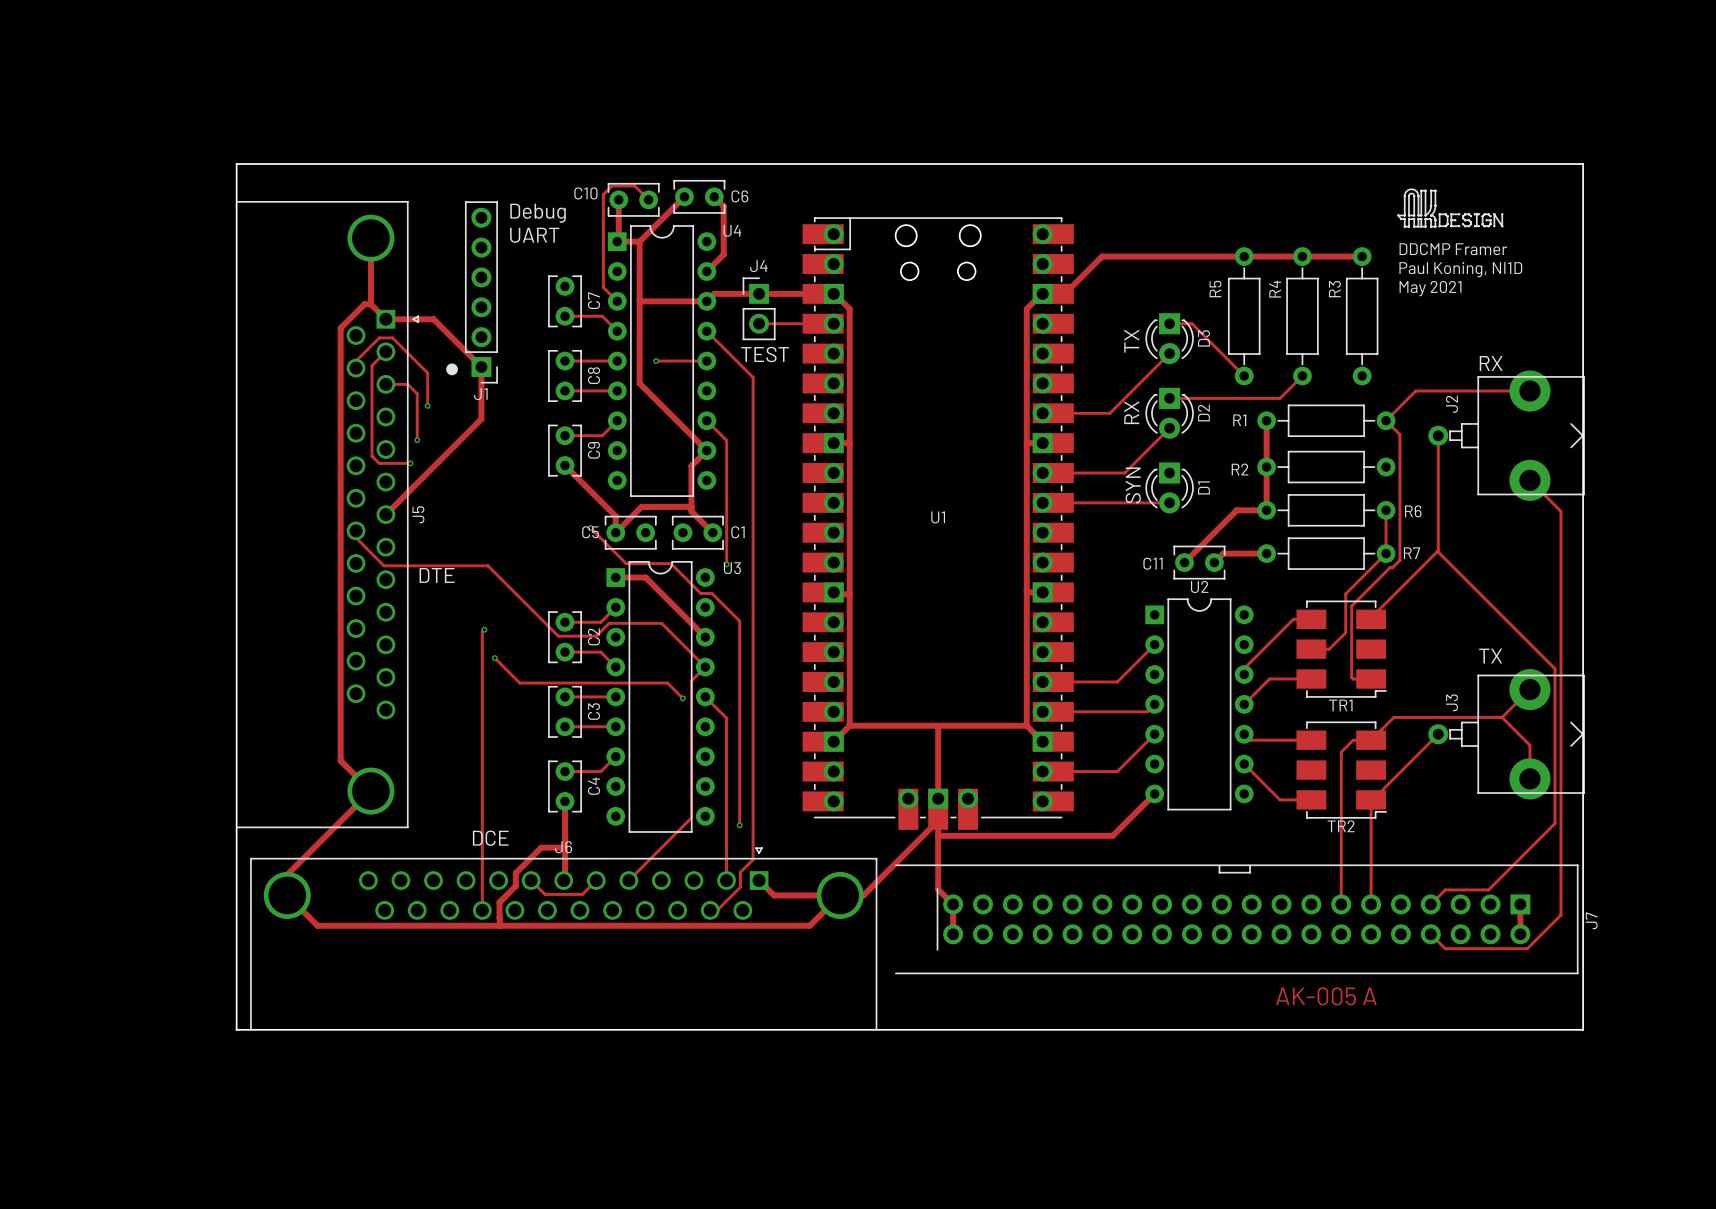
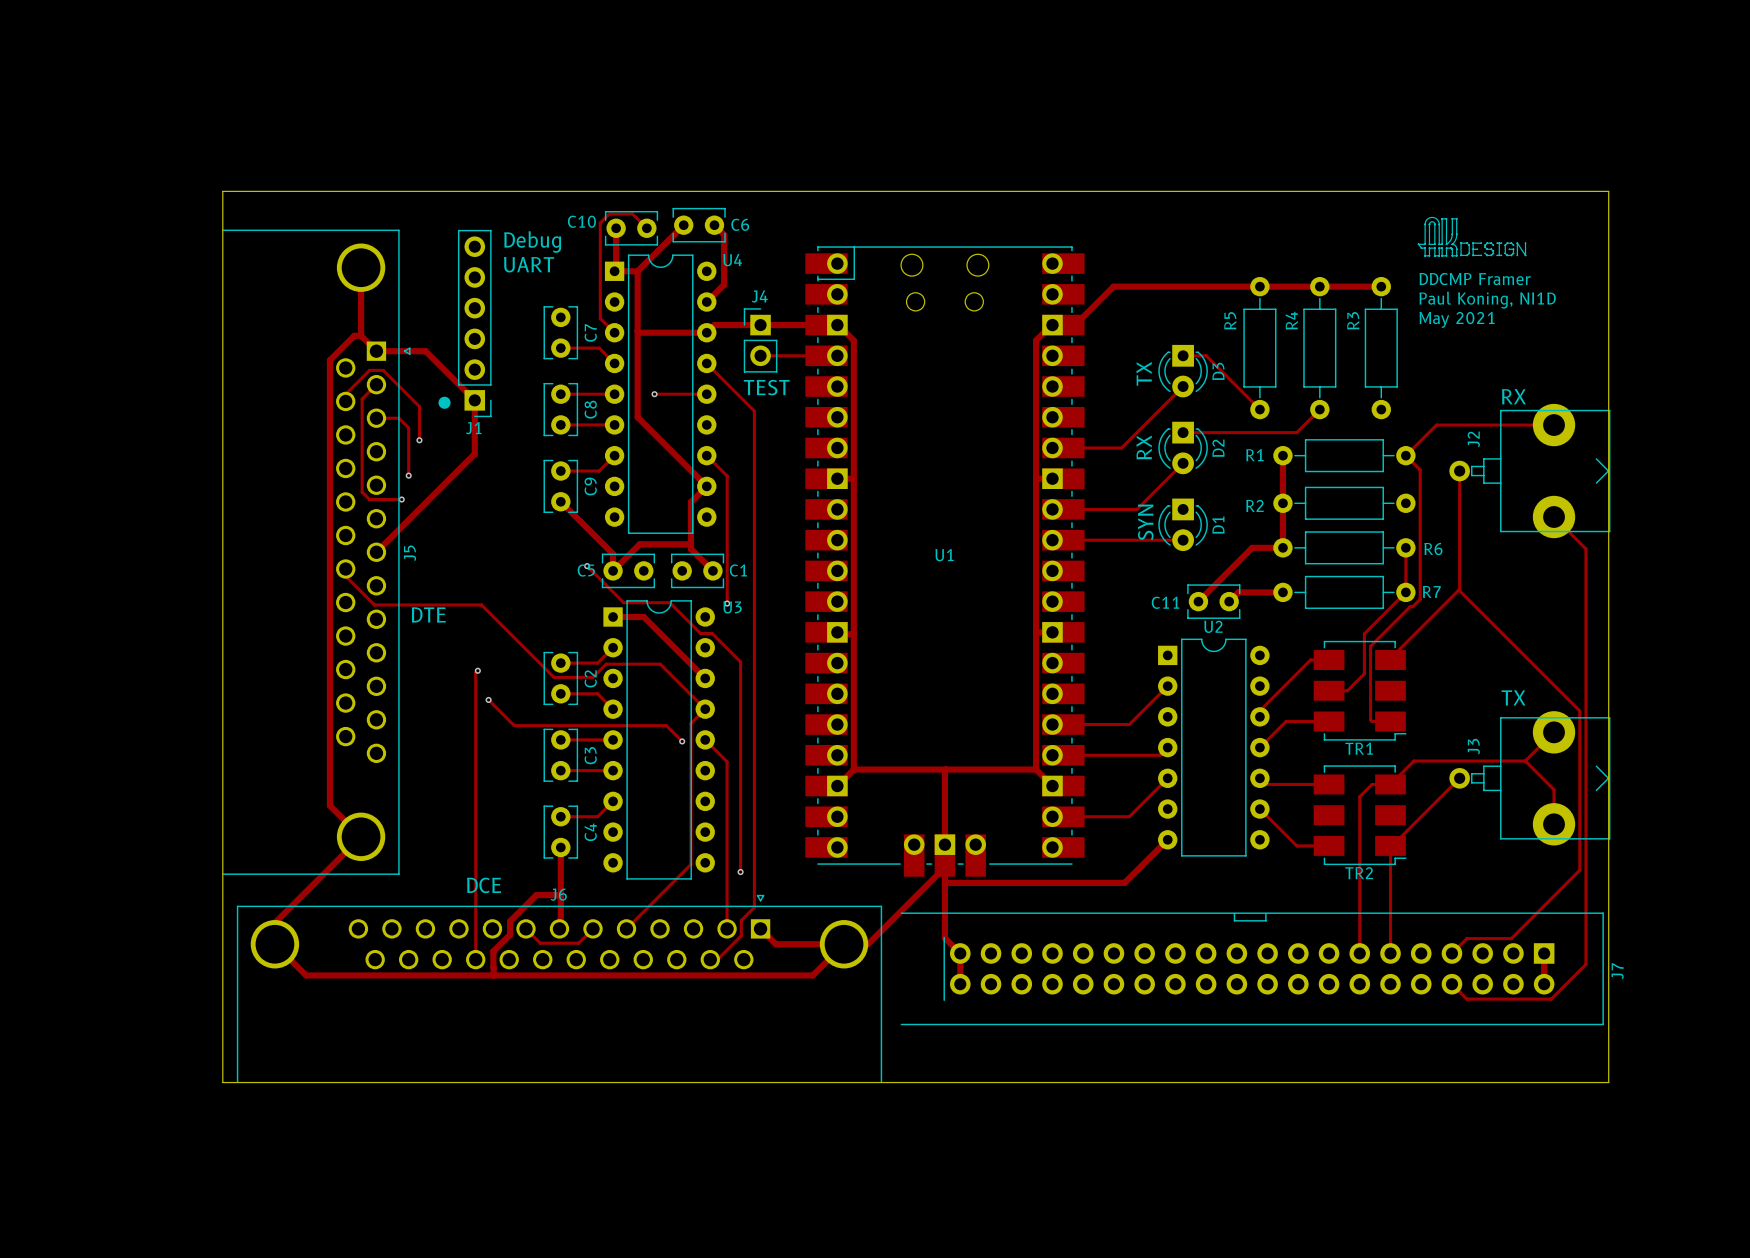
text: AK-005 A (1326, 996) -> none

